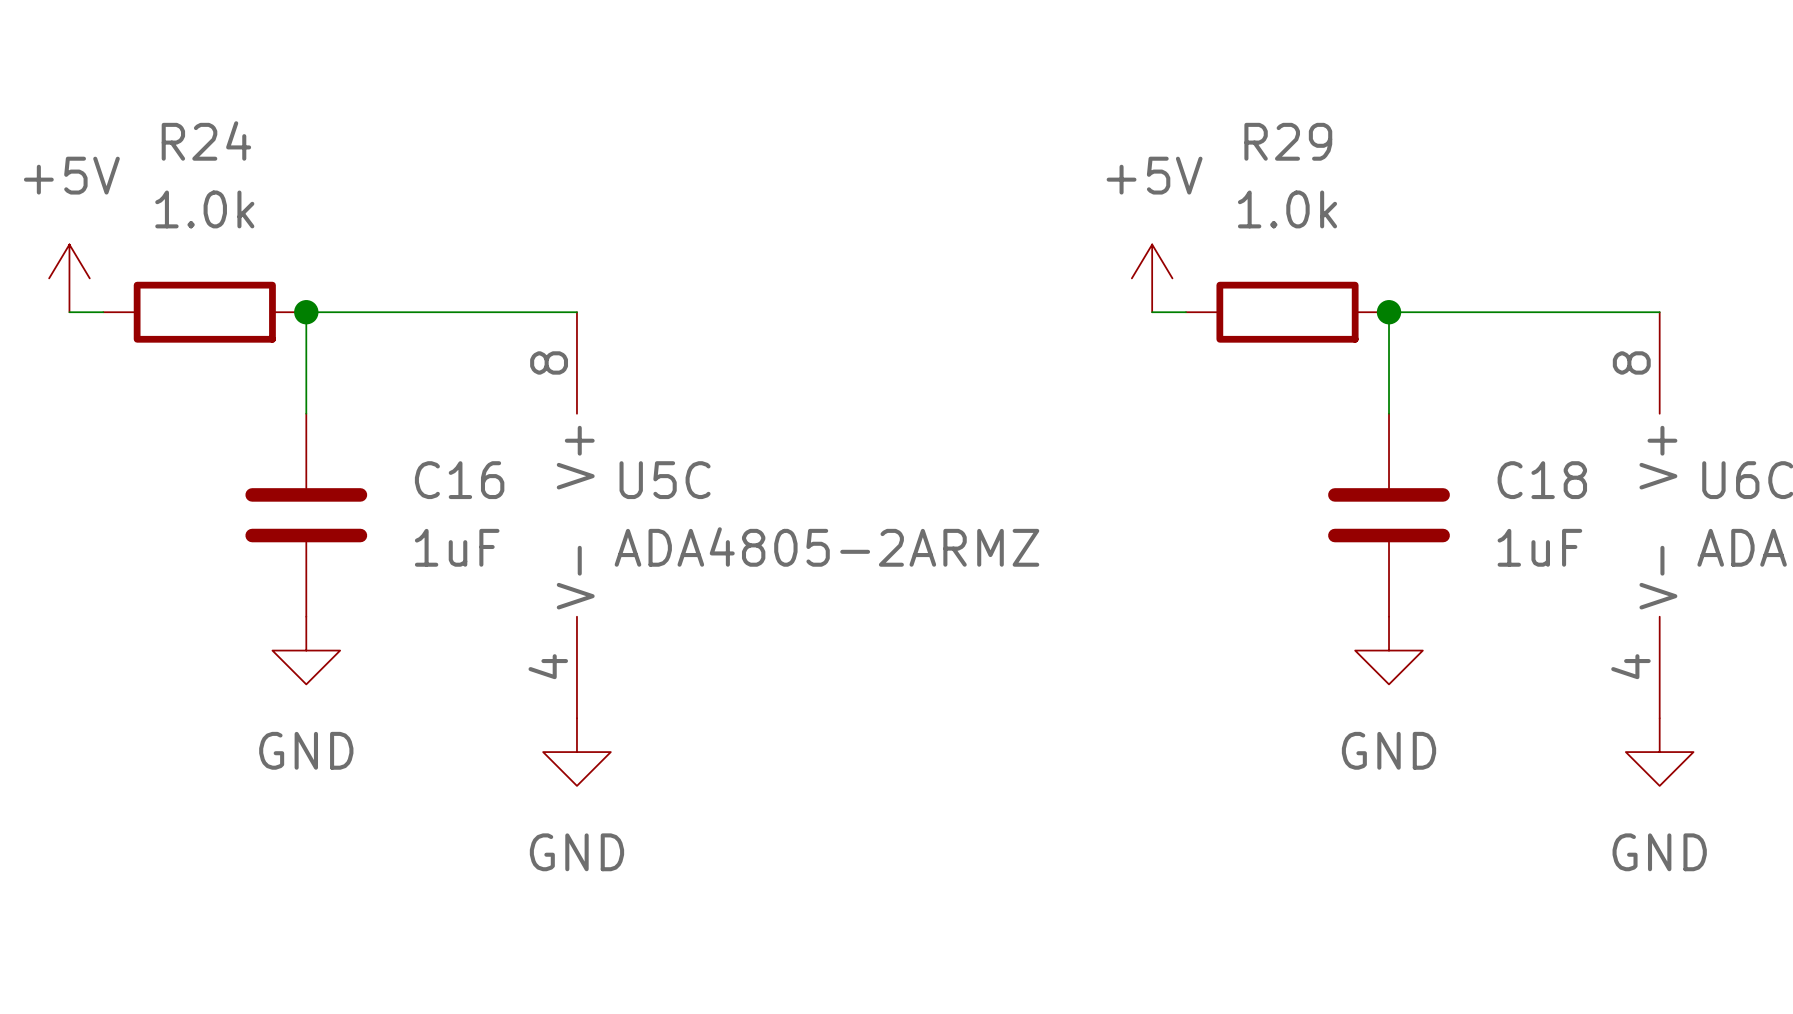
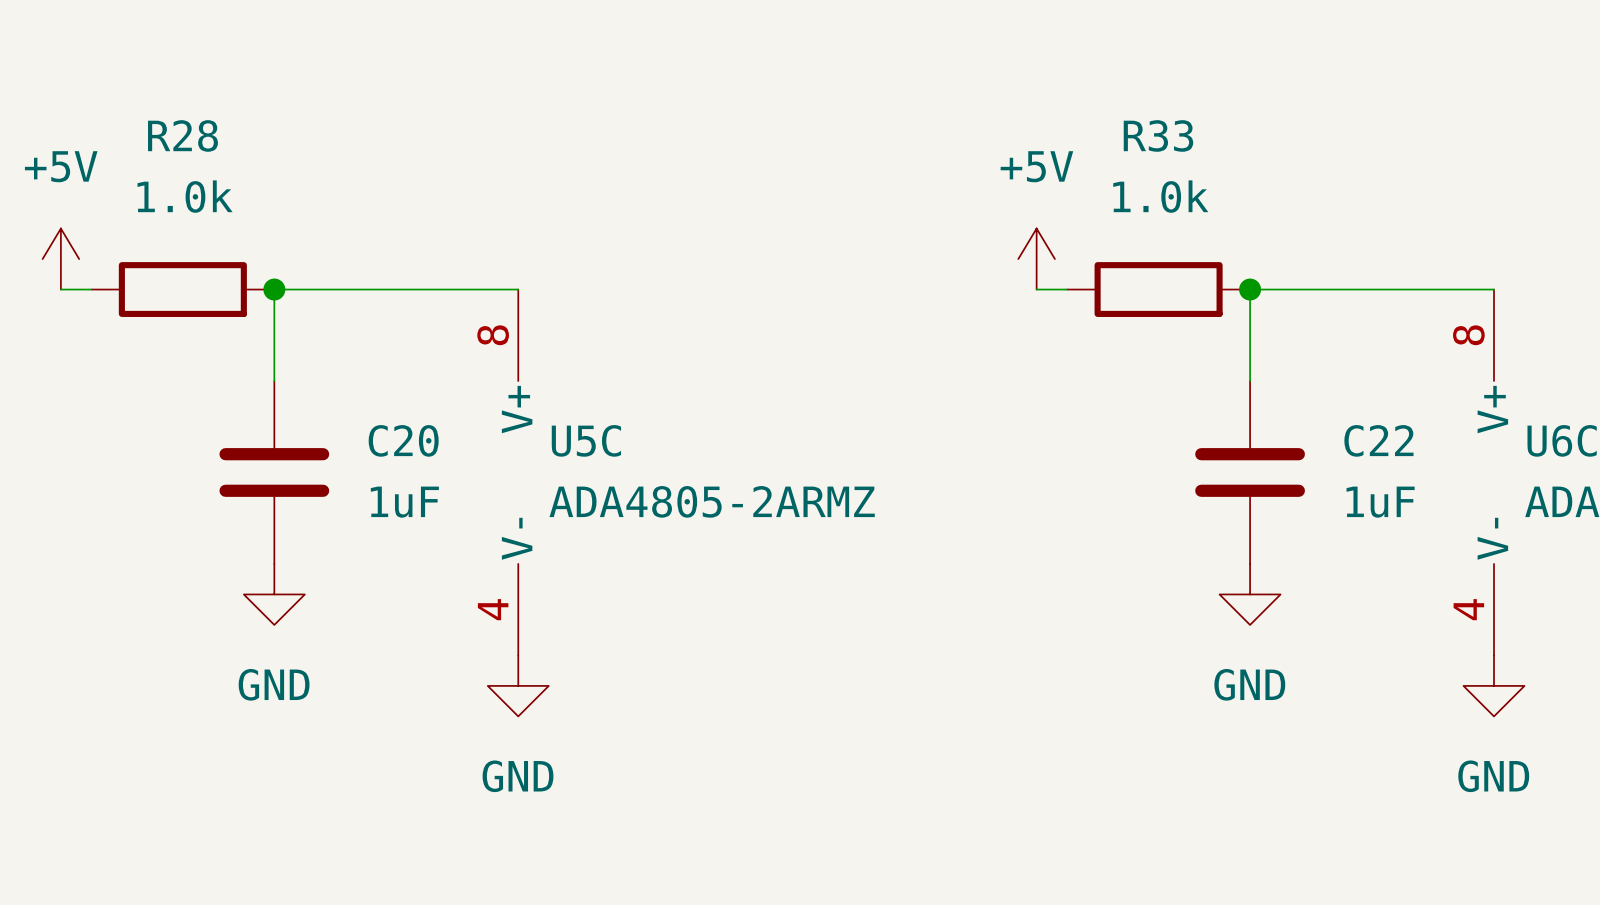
R24 name: R24 (206, 140) -> R28 (182, 135)
R29 name: R29 (1288, 141) -> R33 (1158, 135)
C16 name: C16 (459, 480) -> C20 (403, 440)
C18 name: C18 (1542, 480) -> C22 (1378, 440)

